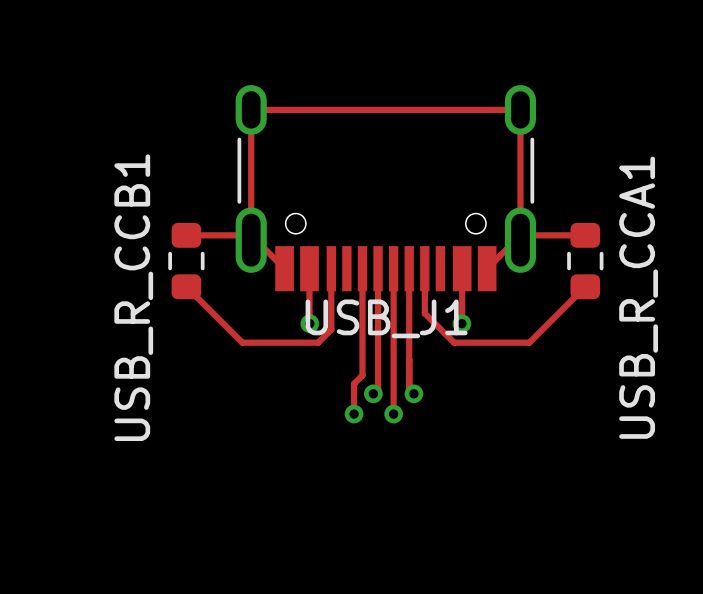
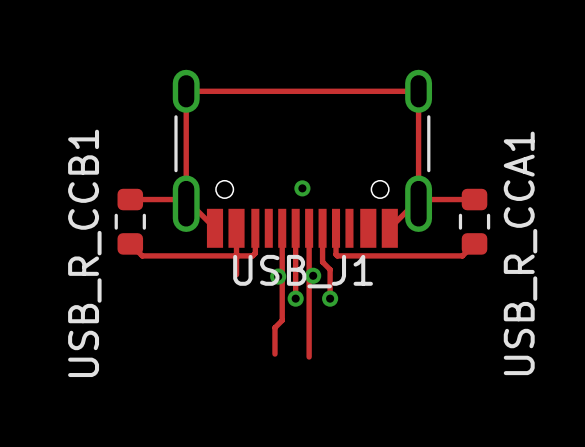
via: none -> (302, 188)
track: (462, 268) (462, 322) -> none
track: (331, 297) (331, 329) (318, 342) (242, 342) (200, 300) -> (255, 253) (252, 255) (142, 255)
track: (424, 299) (424, 313) (454, 342) (529, 342) (571, 300) -> (336, 254) (462, 255)
track: (409, 307) (409, 389) (413, 393) -> (322, 262) (330, 269) (330, 298)
via: (309, 323) -> none
via: none -> (313, 275)
via: (461, 323) -> none
via: none -> (278, 276)
track: (378, 350) (378, 389) (373, 393) -> none
via: none -> (295, 298)
via: none -> (330, 298)
via: (373, 393) -> none
via: (413, 393) -> none
via: (354, 414) -> none
via: (393, 414) -> none

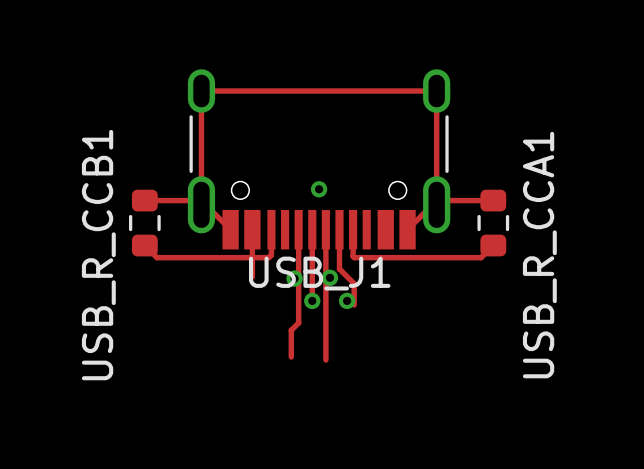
track: (322, 262) (330, 269) (330, 298) -> (339, 263) (339, 269) (354, 284)
track: none -> (354, 284) (354, 304)

